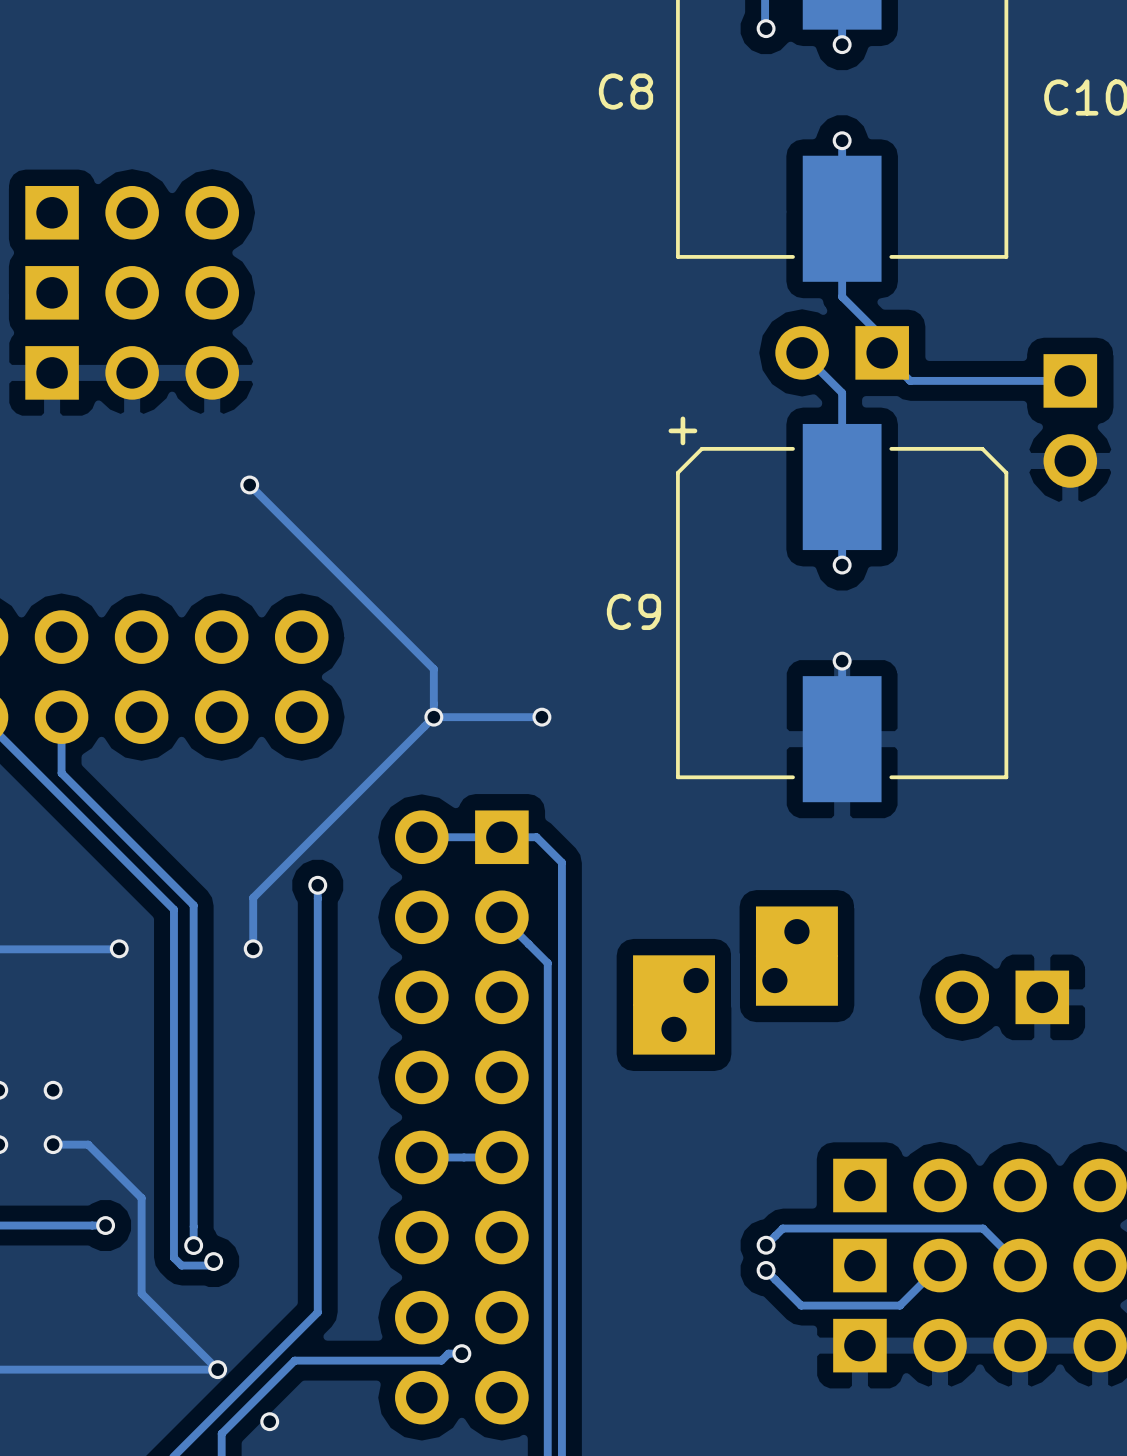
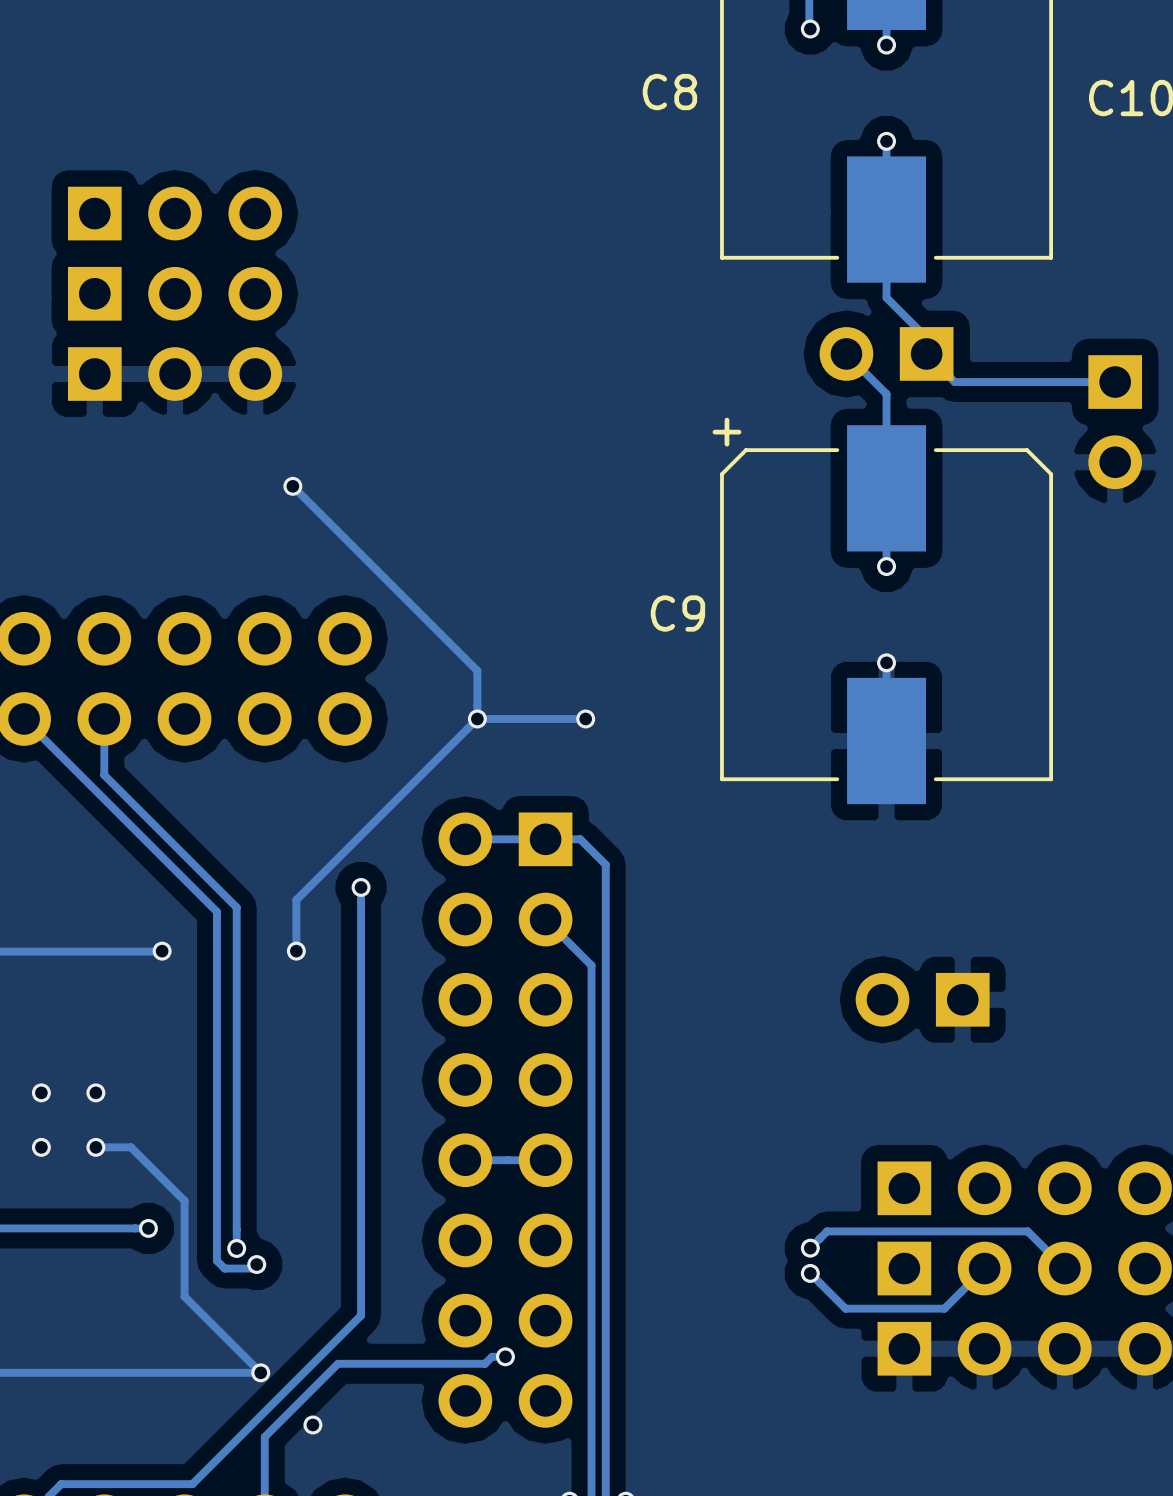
part: (735, 980) -> none
part position: (1002, 997) -> (922, 999)

